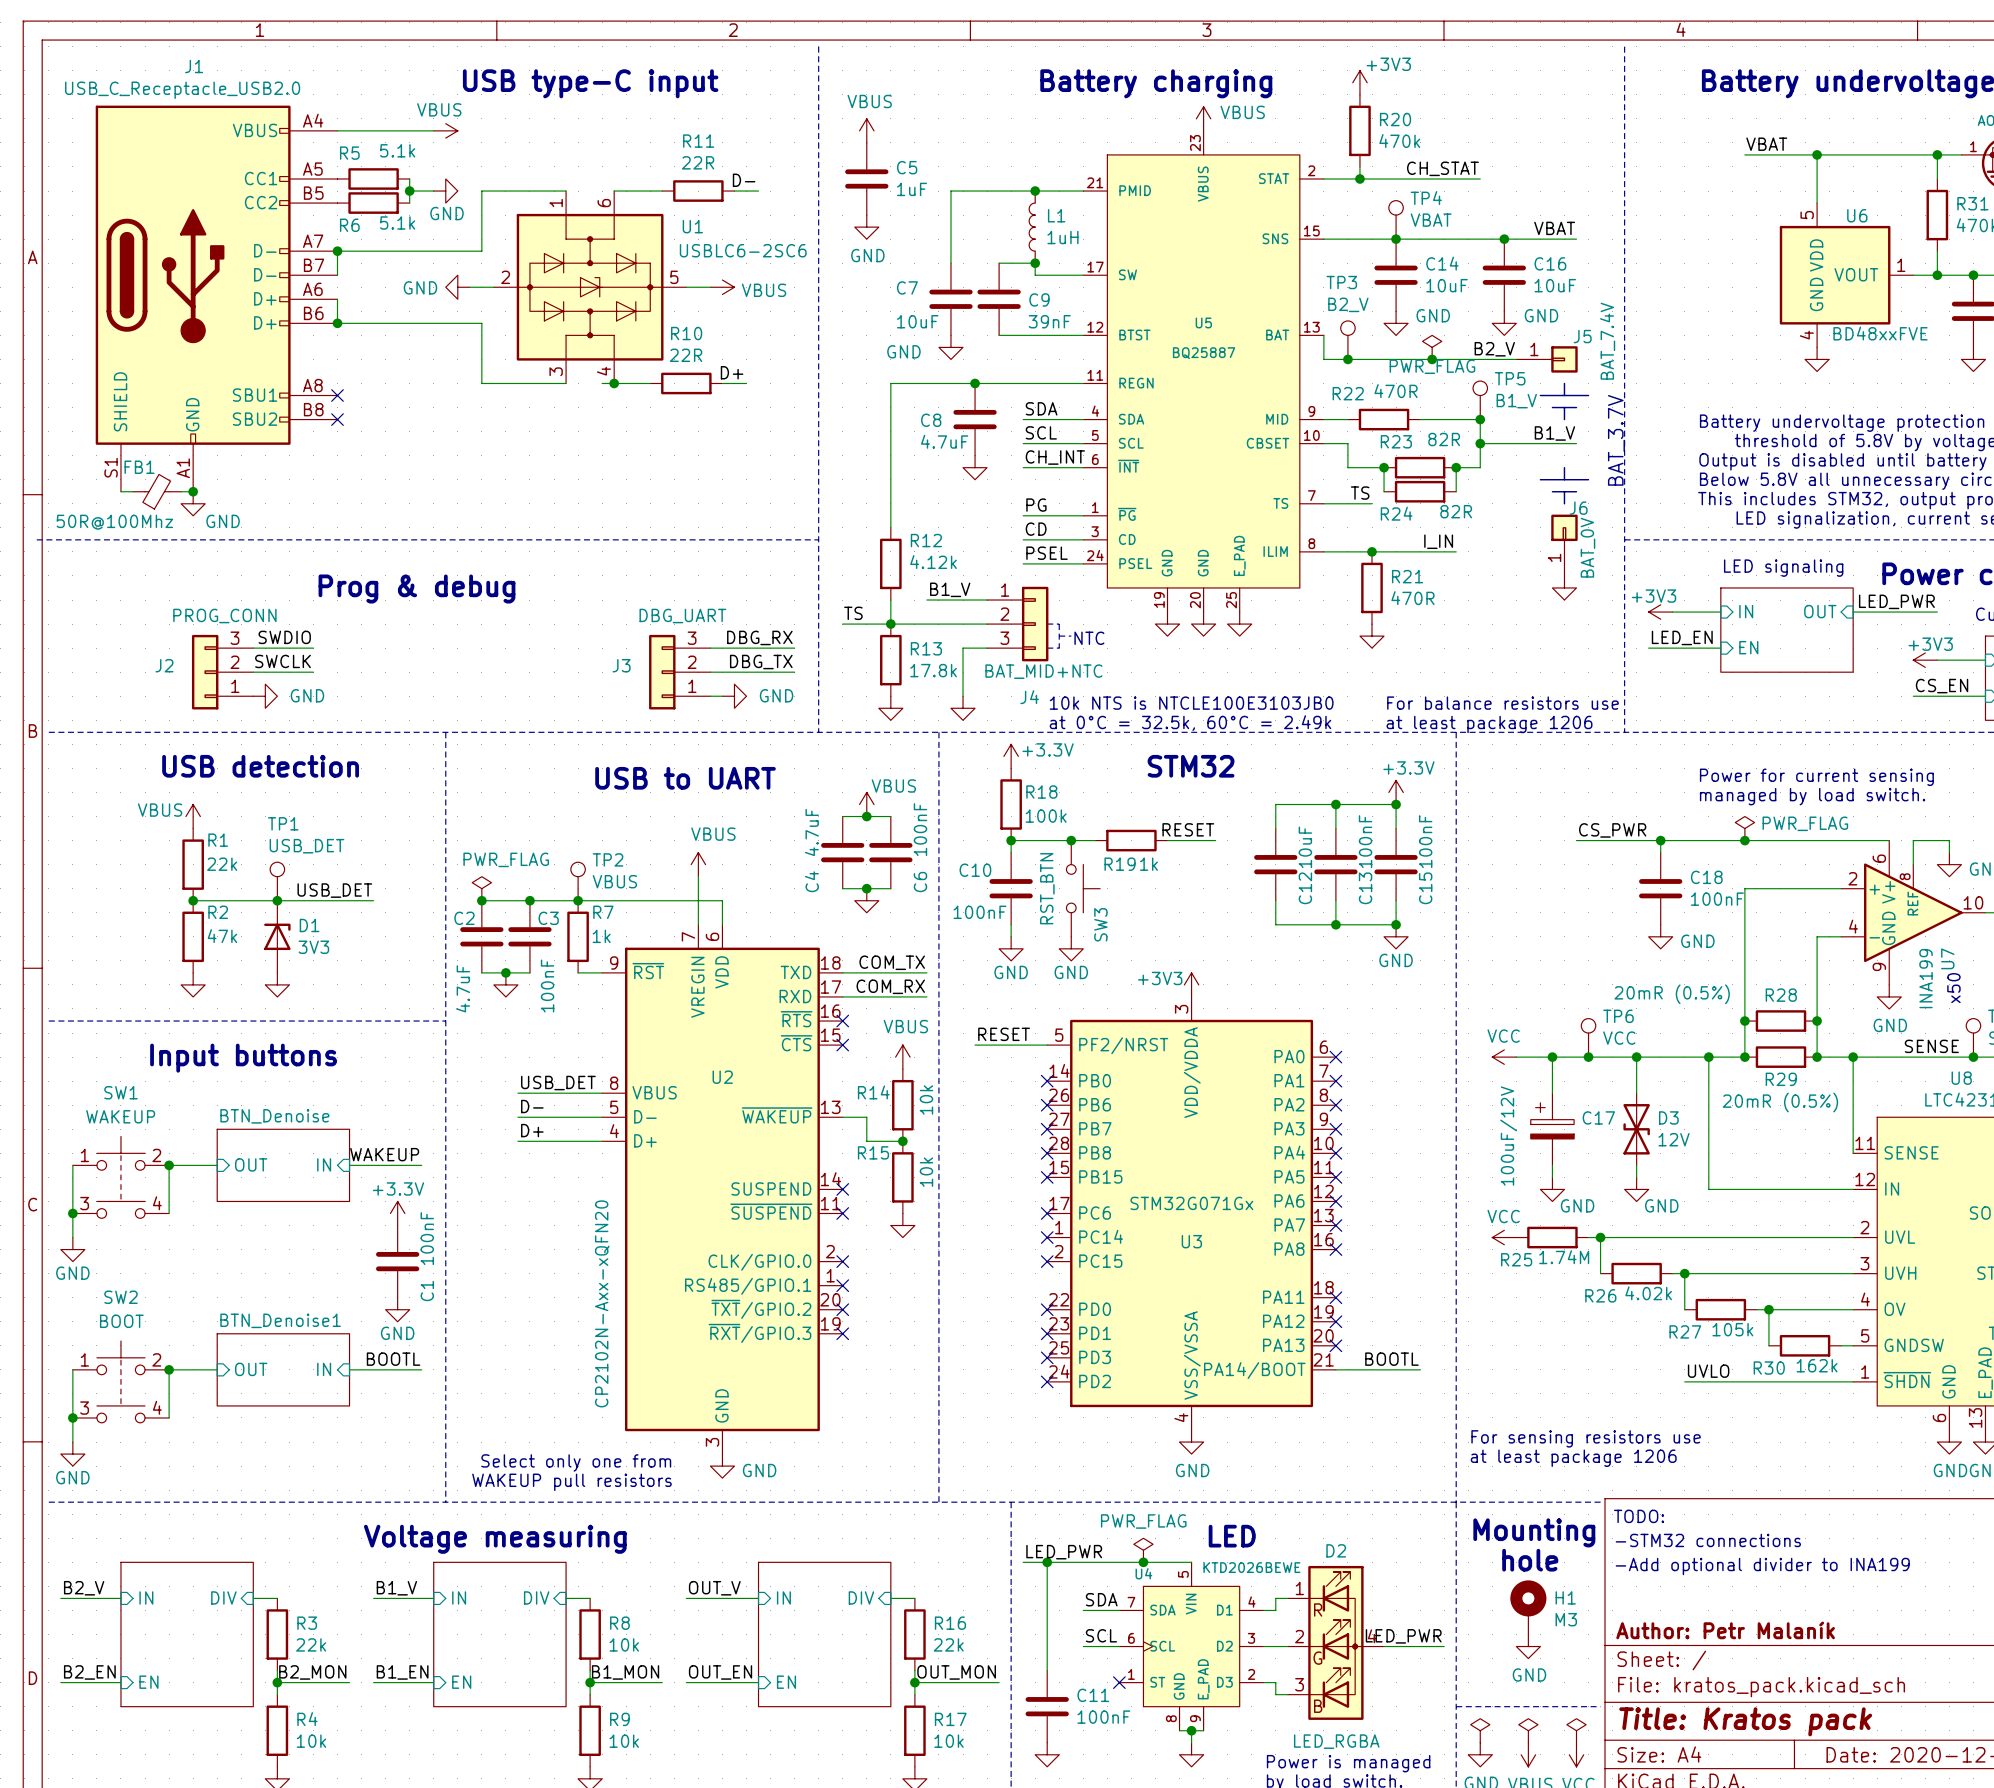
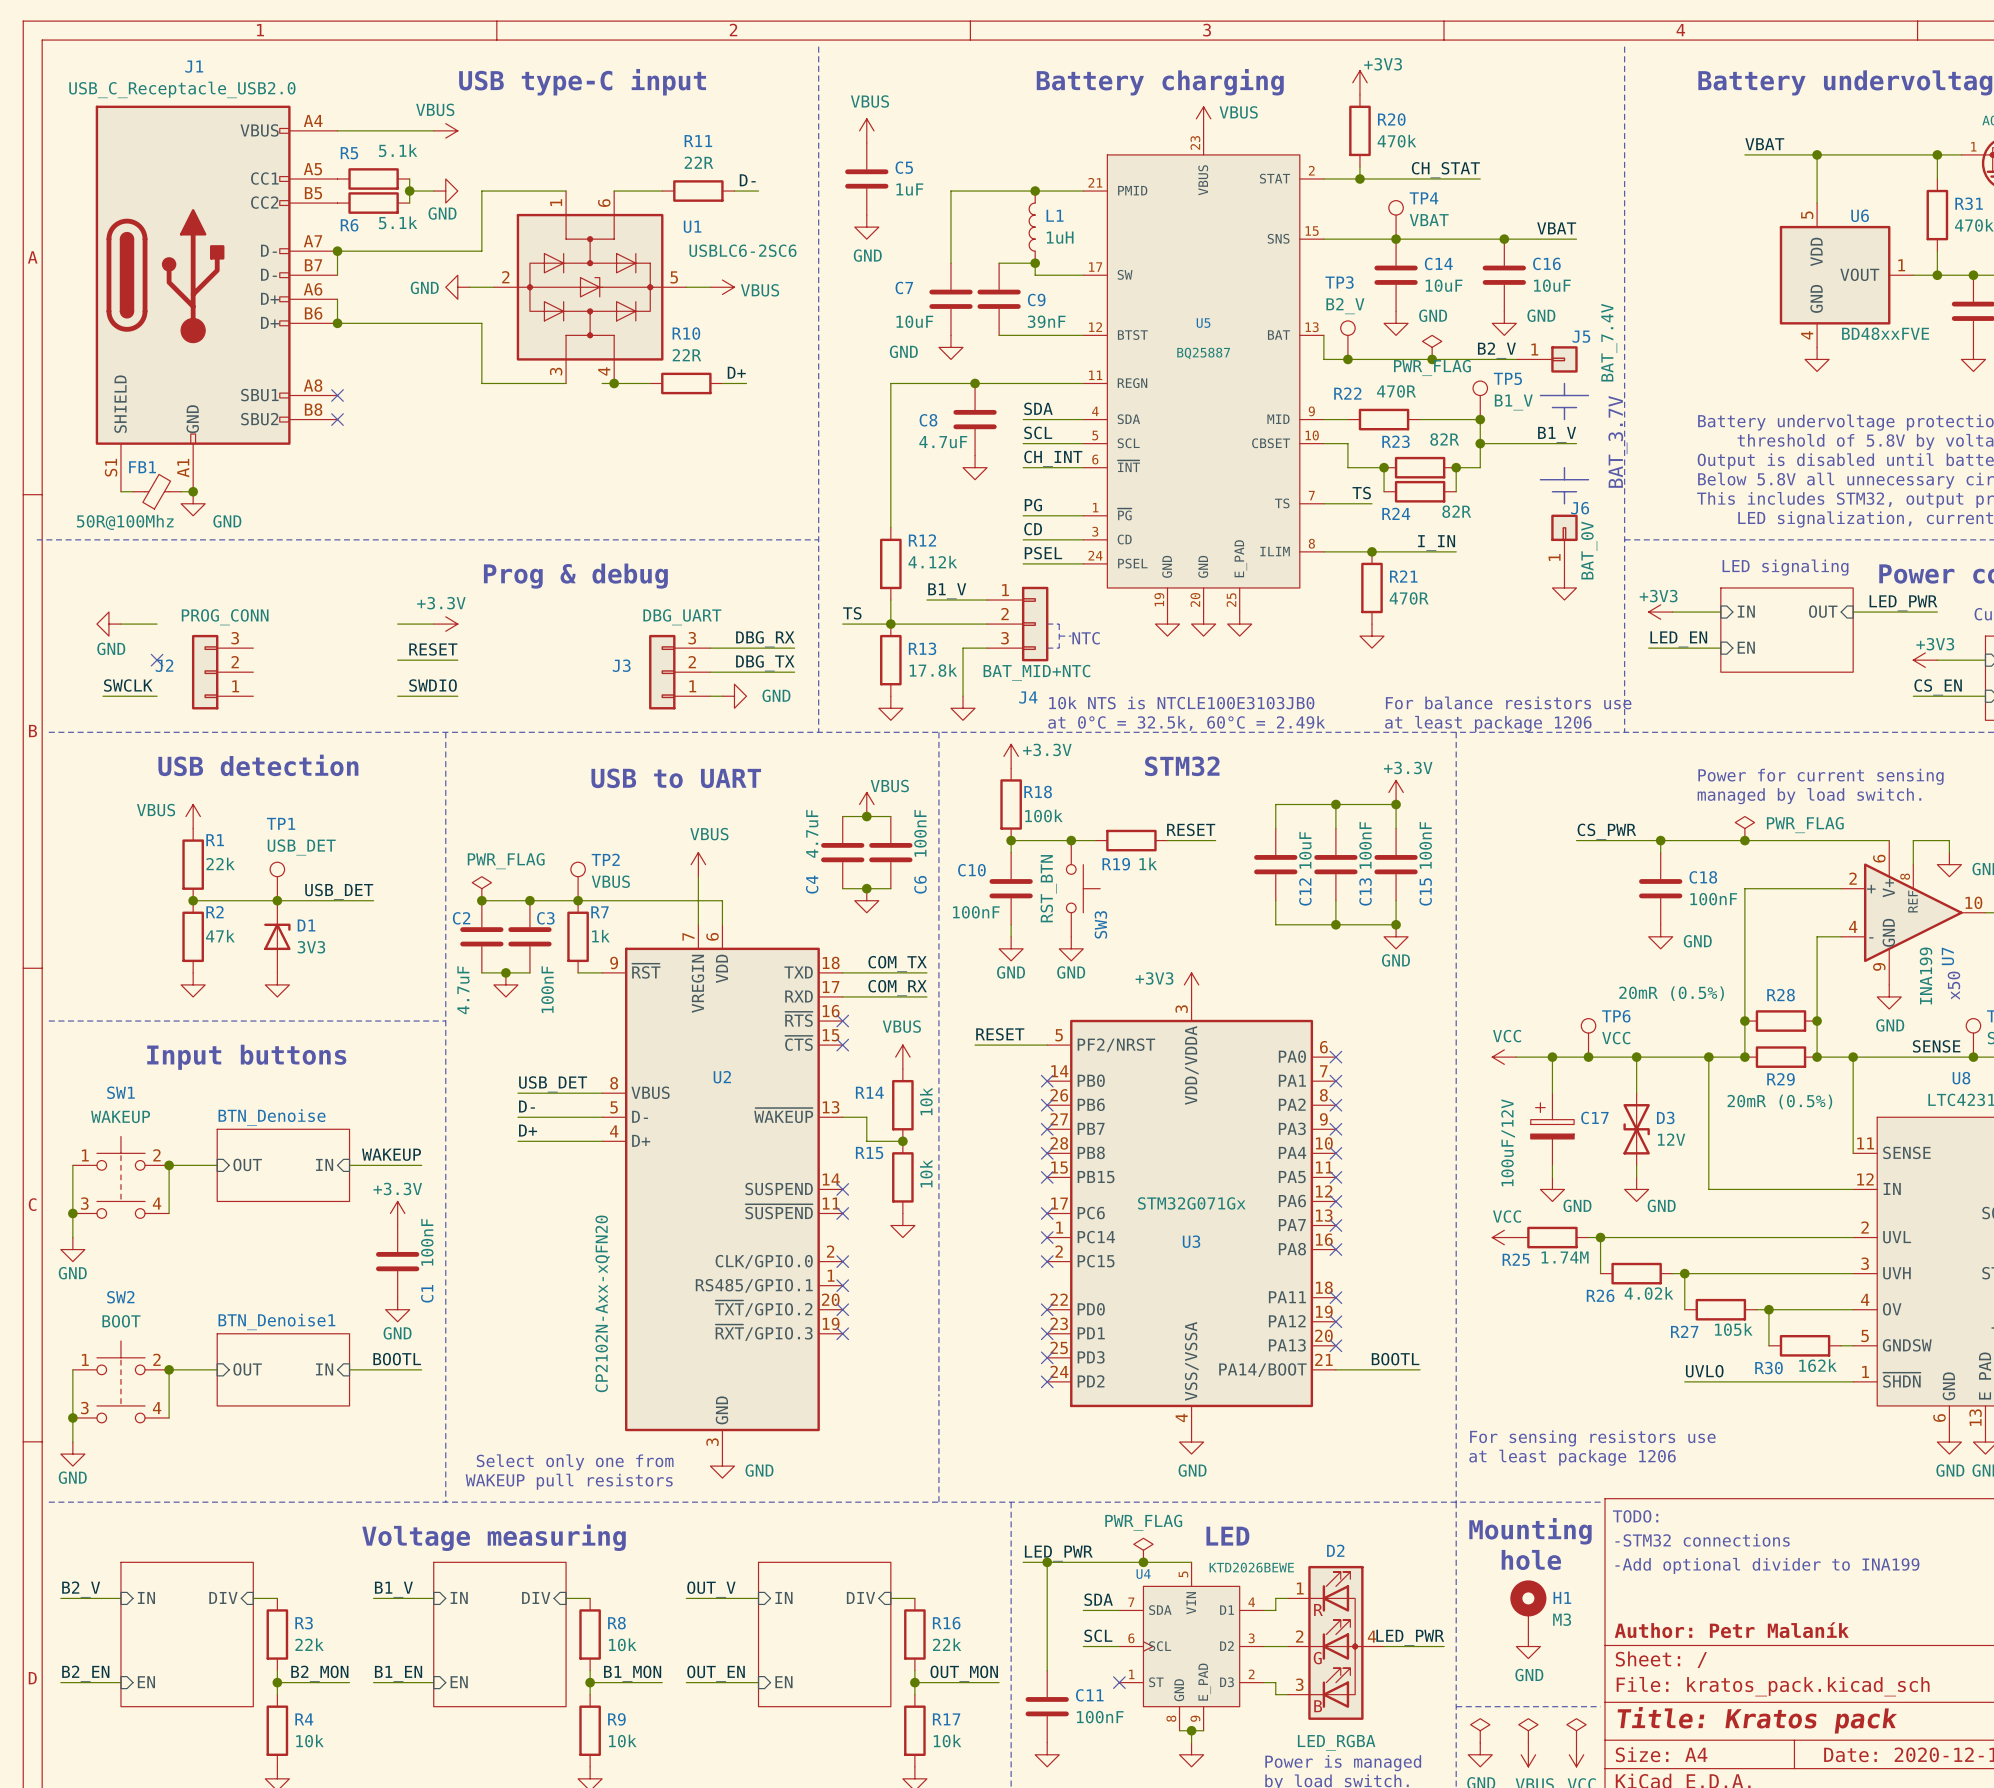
text position: Prog & debug (416, 589) -> Prog & debug (575, 576)
wire: none -> (120, 624) (157, 624)
wire: none -> (397, 624) (433, 624)
power symbol: none -> +3.3V (445, 624)
label position: SWDIO (284, 637) -> SWDIO (433, 685)
wire: (253, 648) (313, 648) -> (397, 660) (457, 660)
label: none -> RESET (433, 649)
no-connect mark: none -> (157, 660)
label position: SWCLK (283, 661) -> SWCLK (128, 685)
wire: (253, 672) (313, 672) -> (397, 696) (457, 696)
power symbol text position: GND (307, 695) -> GND (111, 648)
wire: none -> (102, 696) (157, 696)
power symbol rotation: 0° (265, 696) -> 180° (108, 624)
power symbol position: GND (265, 696) -> GND (108, 624)

